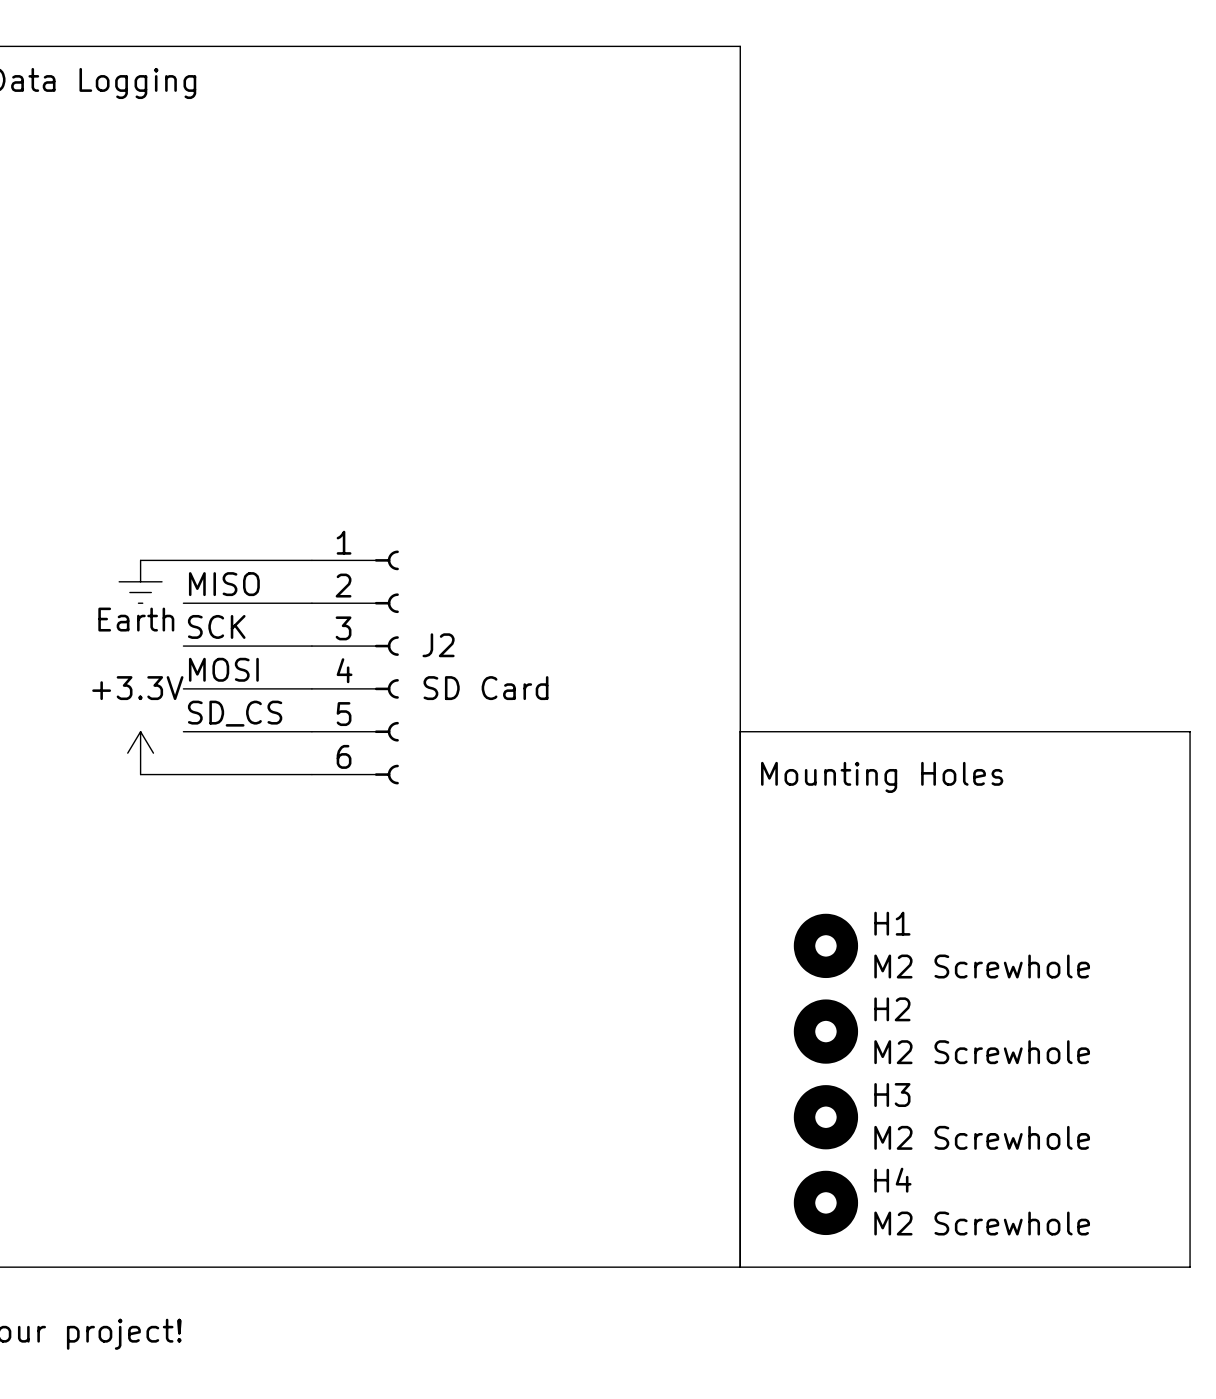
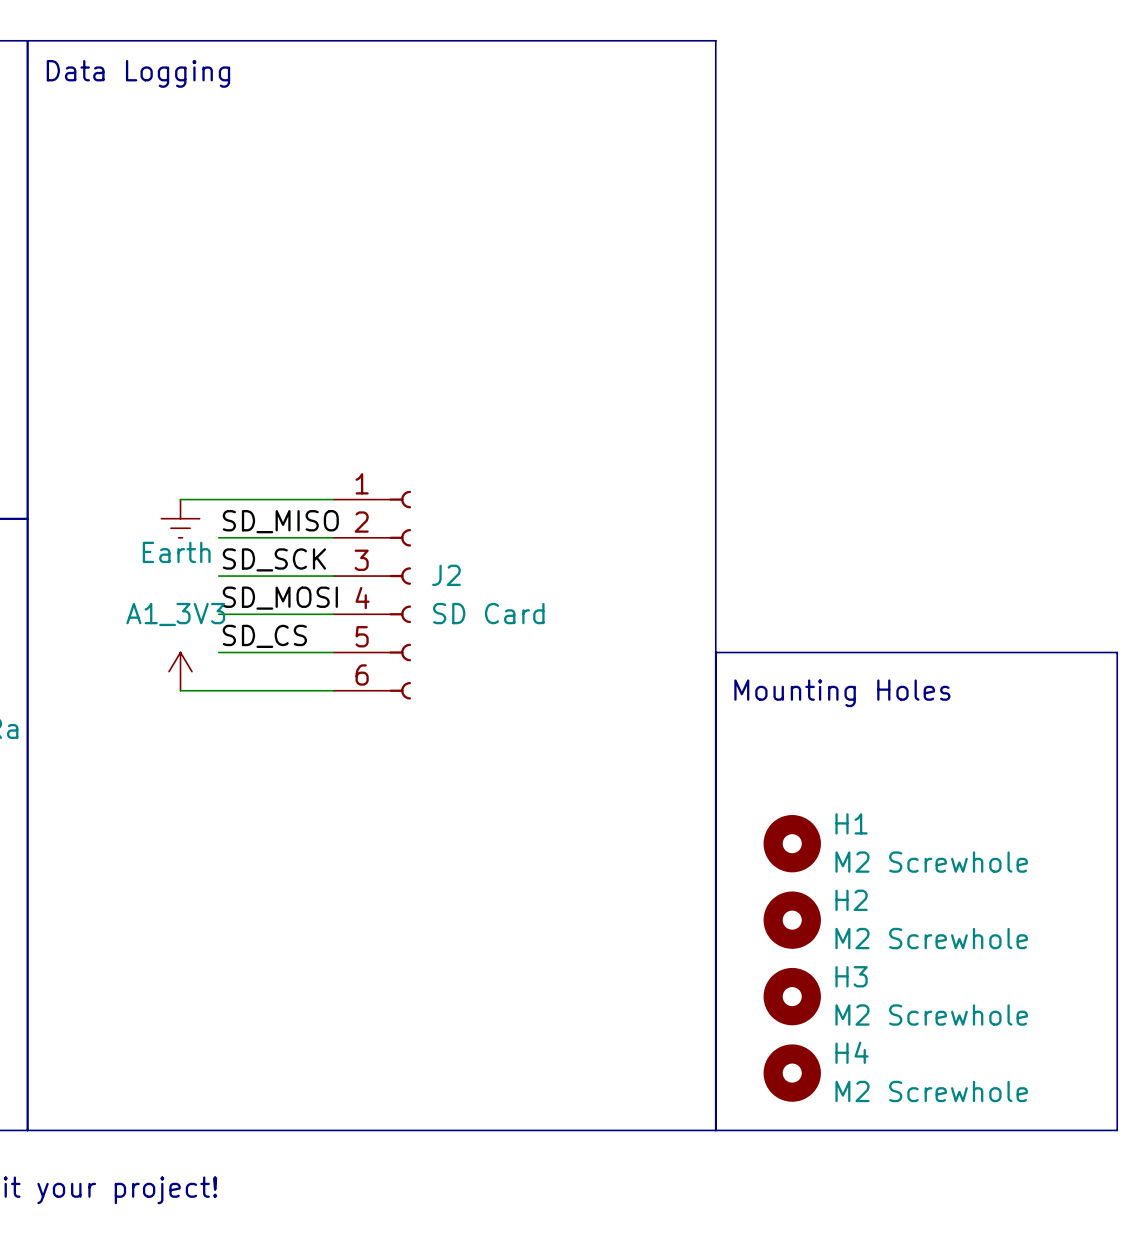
label: MISO (224, 584) -> SD_MISO (280, 521)
label: SCK (216, 626) -> SD_SCK (274, 559)
label: MOSI (223, 669) -> SD_MOSI (280, 598)
power symbol: +3.3V (140, 753) -> A1_3V3 (180, 671)

